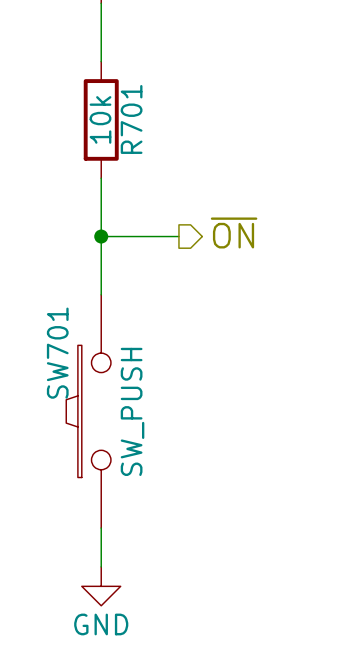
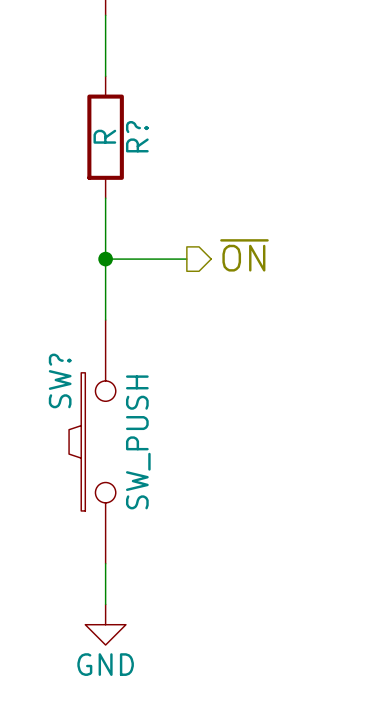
R701 value: 10k (100, 119) -> R (104, 136)
R701 name: R701 (131, 119) -> R? (137, 136)
SW701 name: SW701 (57, 353) -> SW? (60, 380)

